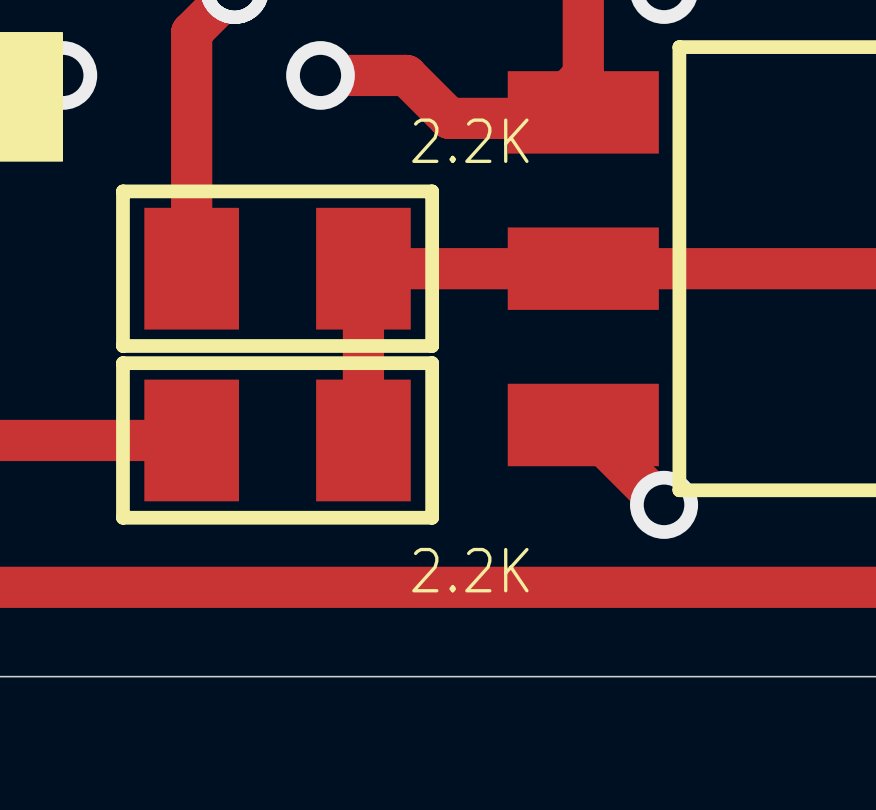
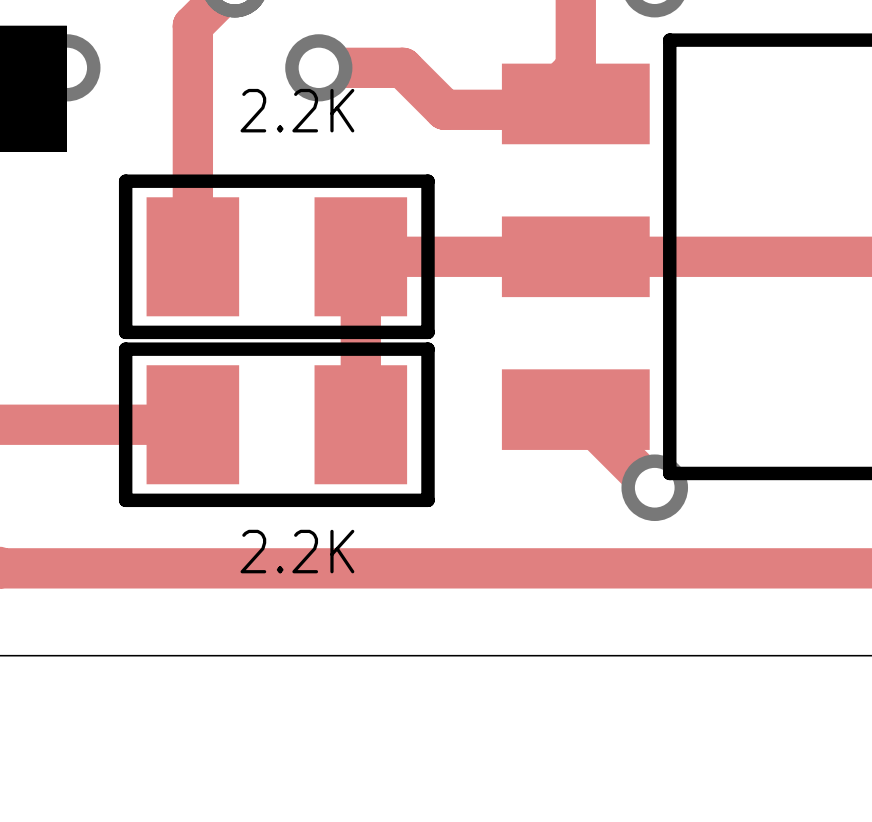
text position: 2.2K (470, 140) -> 2.2K (297, 110)
text position: 2.2K (470, 570) -> 2.2K (297, 551)

